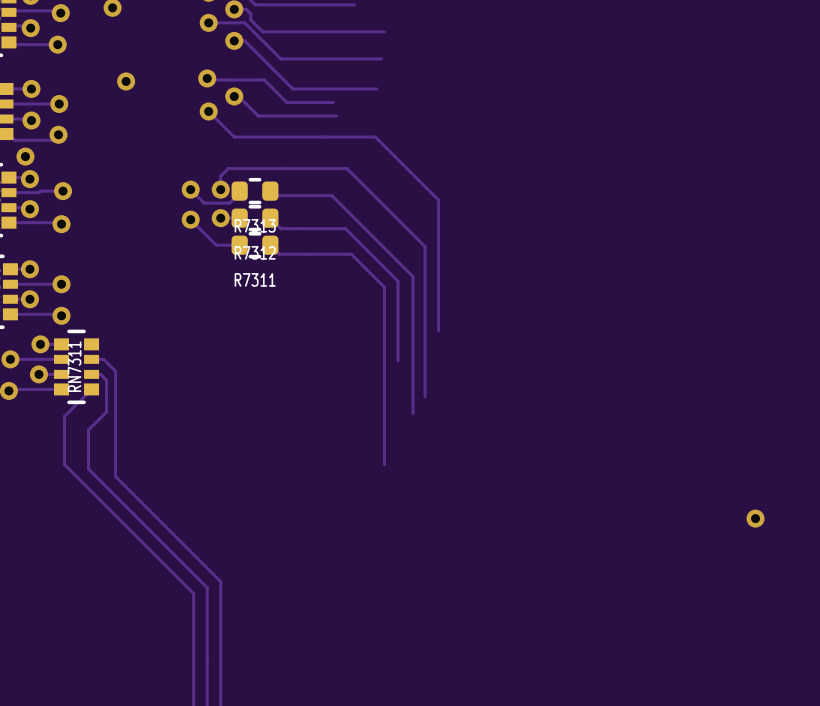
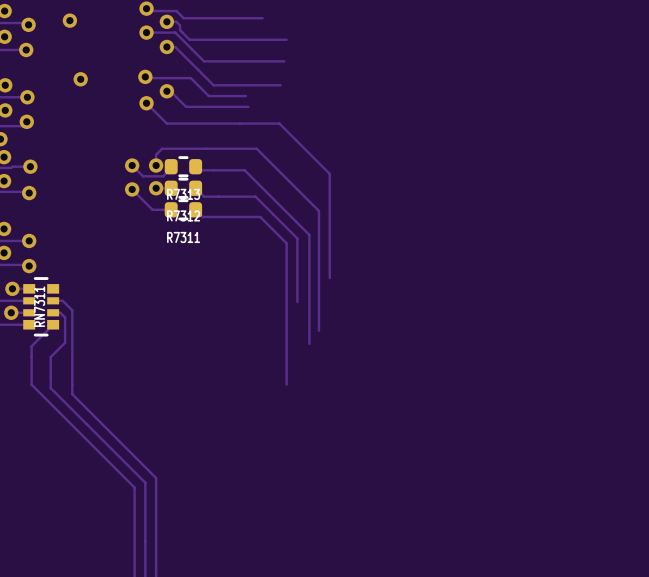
via: (755, 518) -> none

